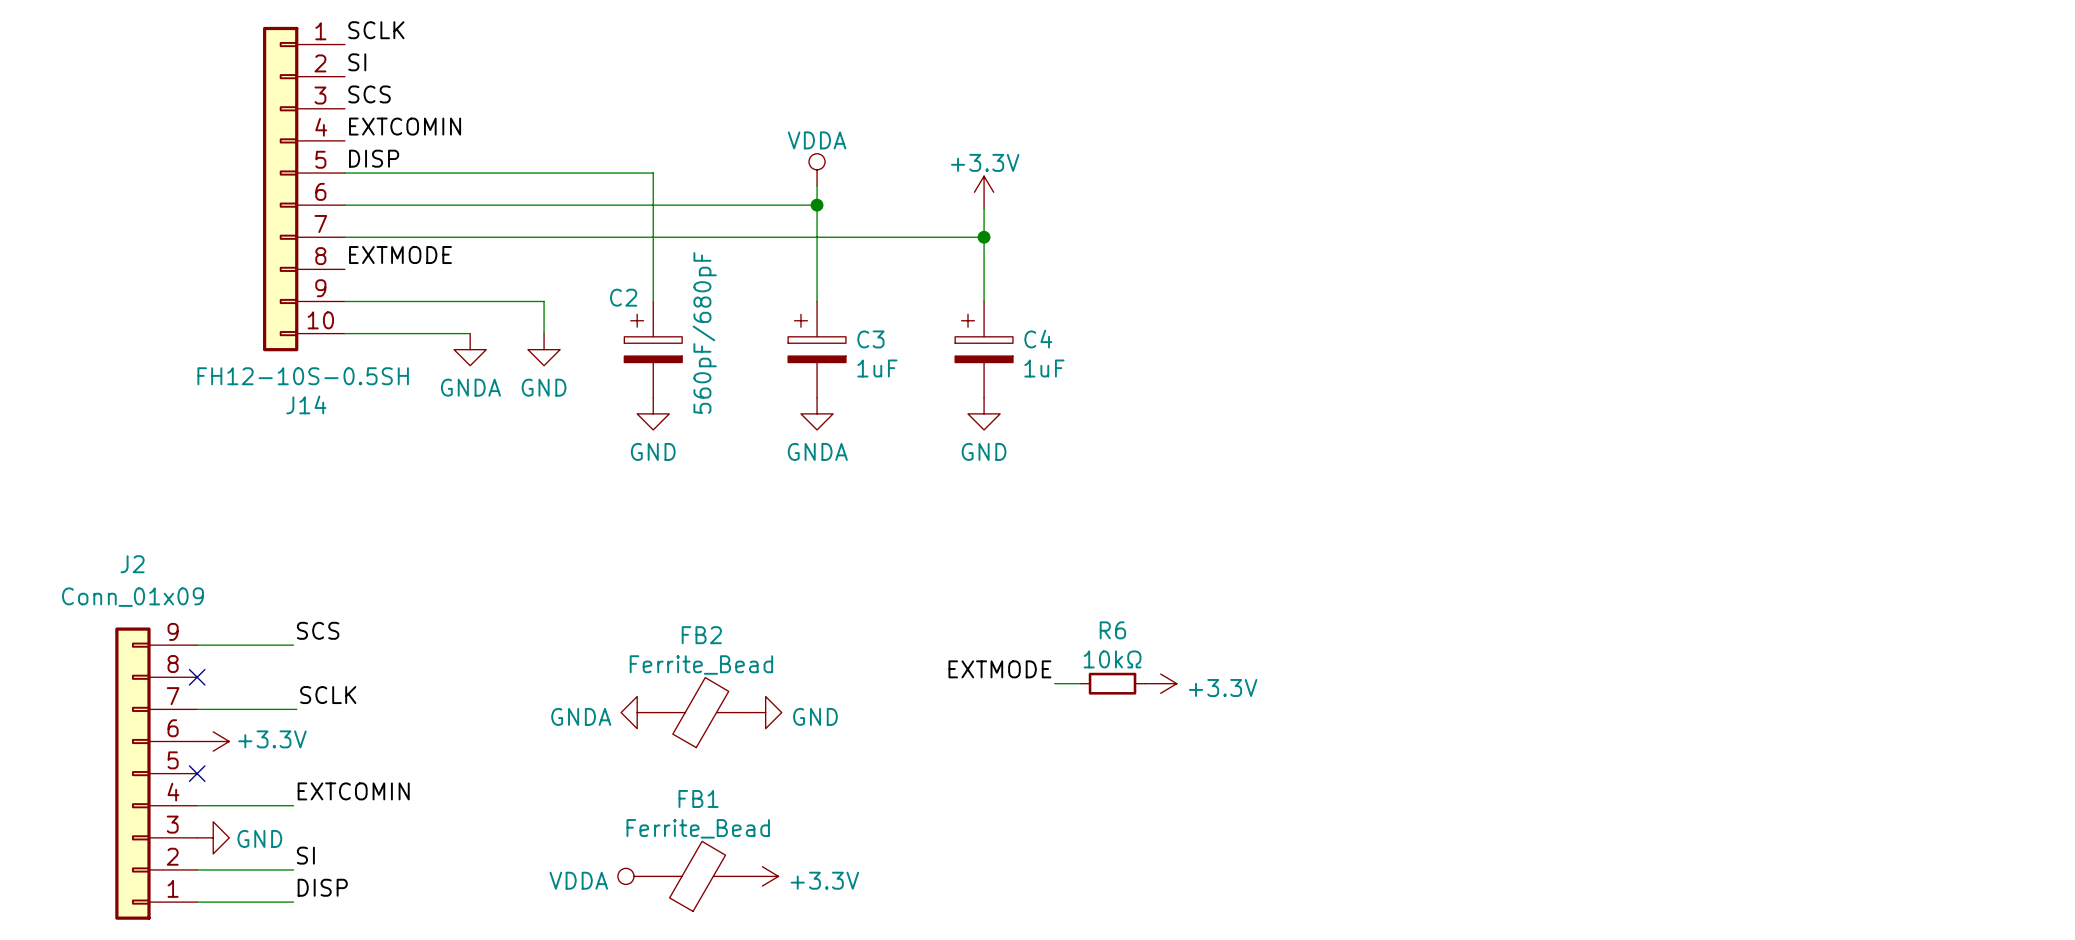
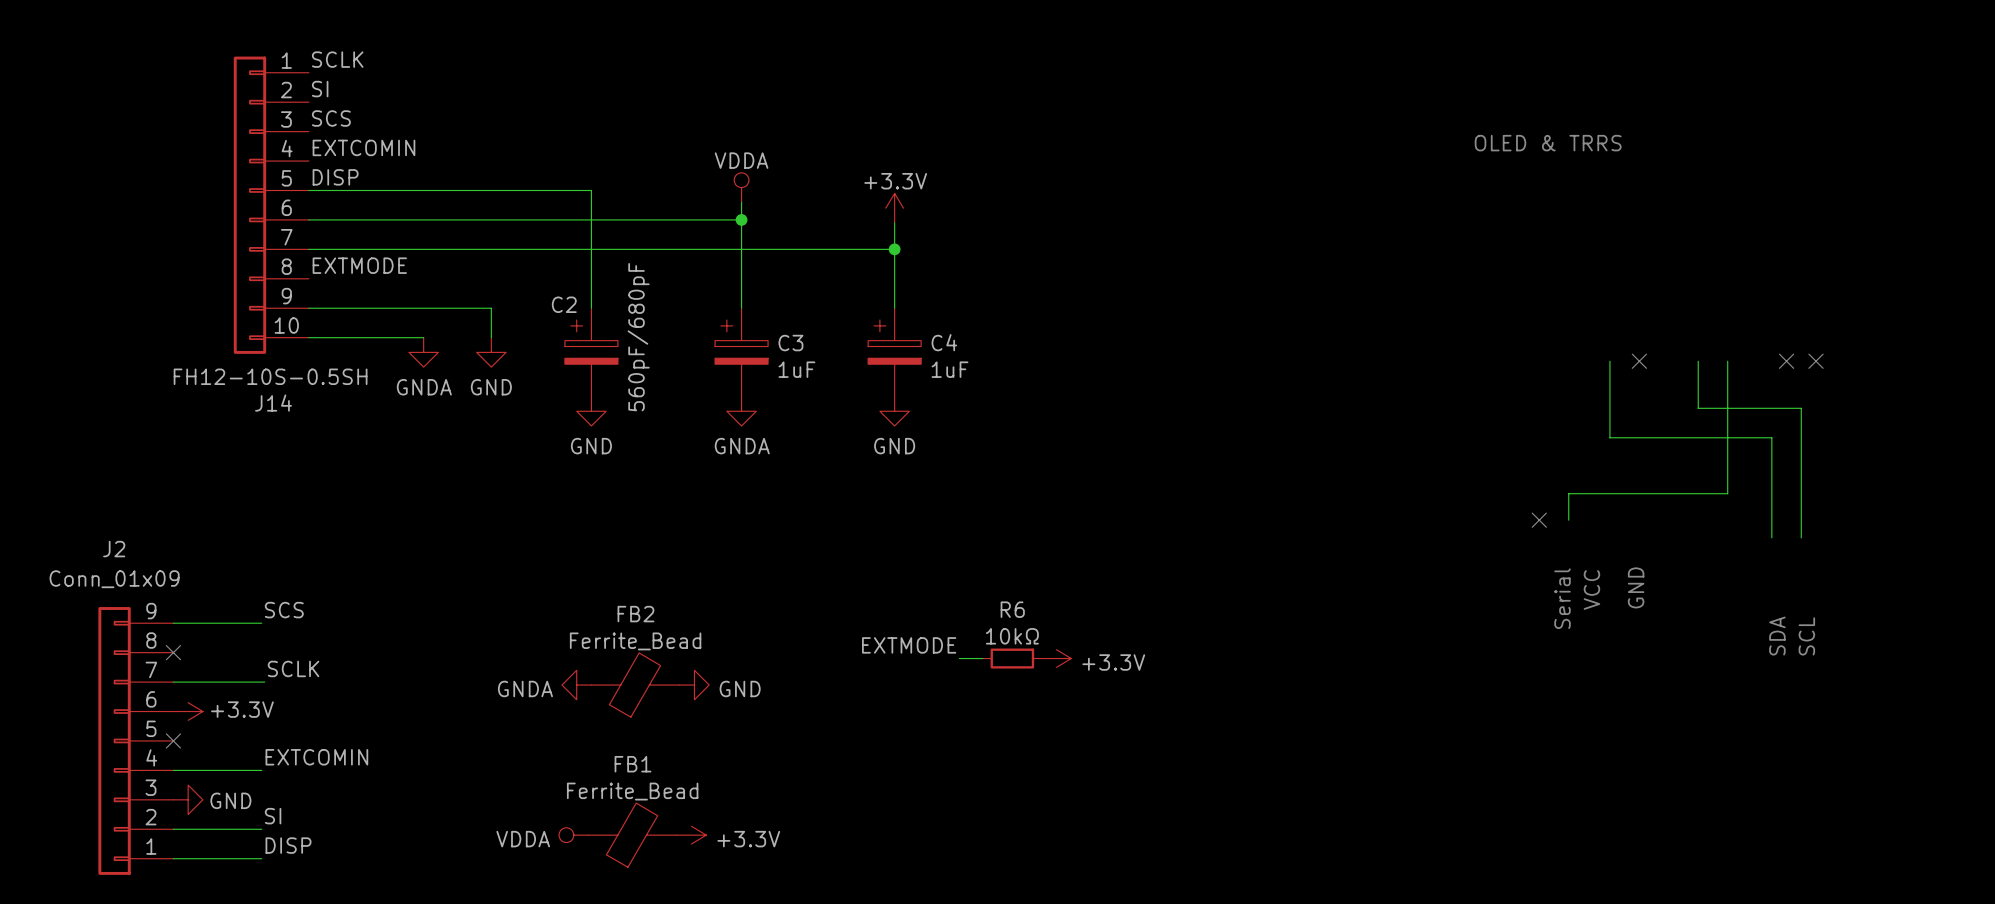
text: none -> OLED & TRRS (1548, 143)
wire: none -> (1609, 361) (1609, 437) (1771, 437) (1771, 537)
no-connect mark: none -> (1639, 361)
wire: none -> (1698, 361) (1698, 408) (1801, 408) (1801, 537)
wire: none -> (1727, 361) (1727, 493) (1568, 493) (1568, 520)
no-connect mark: none -> (1786, 361)
no-connect mark: none -> (1816, 361)
no-connect mark: none -> (1539, 520)
text: none -> GND (1636, 587)
text: none -> VCC (1591, 590)
text: none -> Serial (1562, 598)
text: none -> SDA (1777, 636)
text: none -> SCL (1806, 636)

